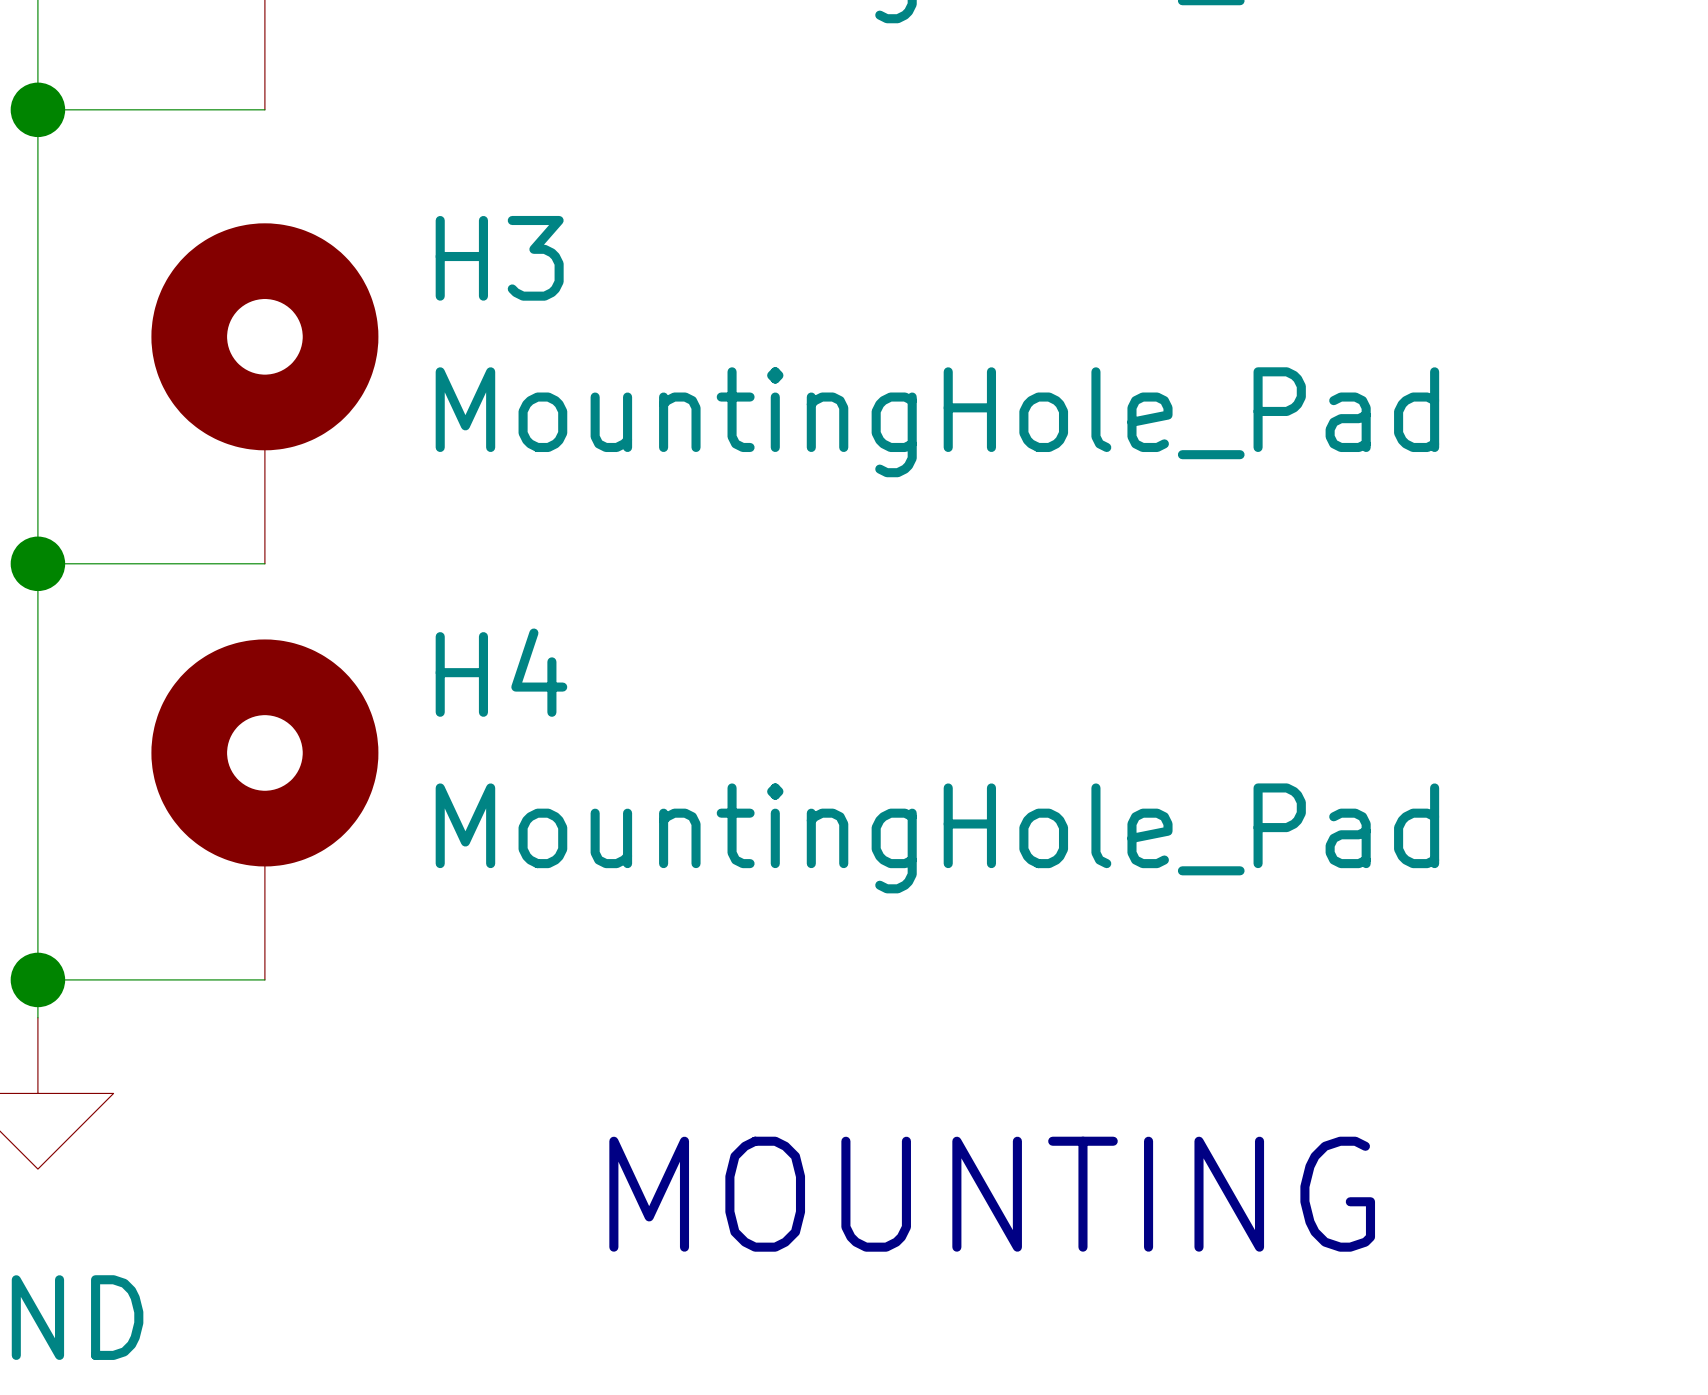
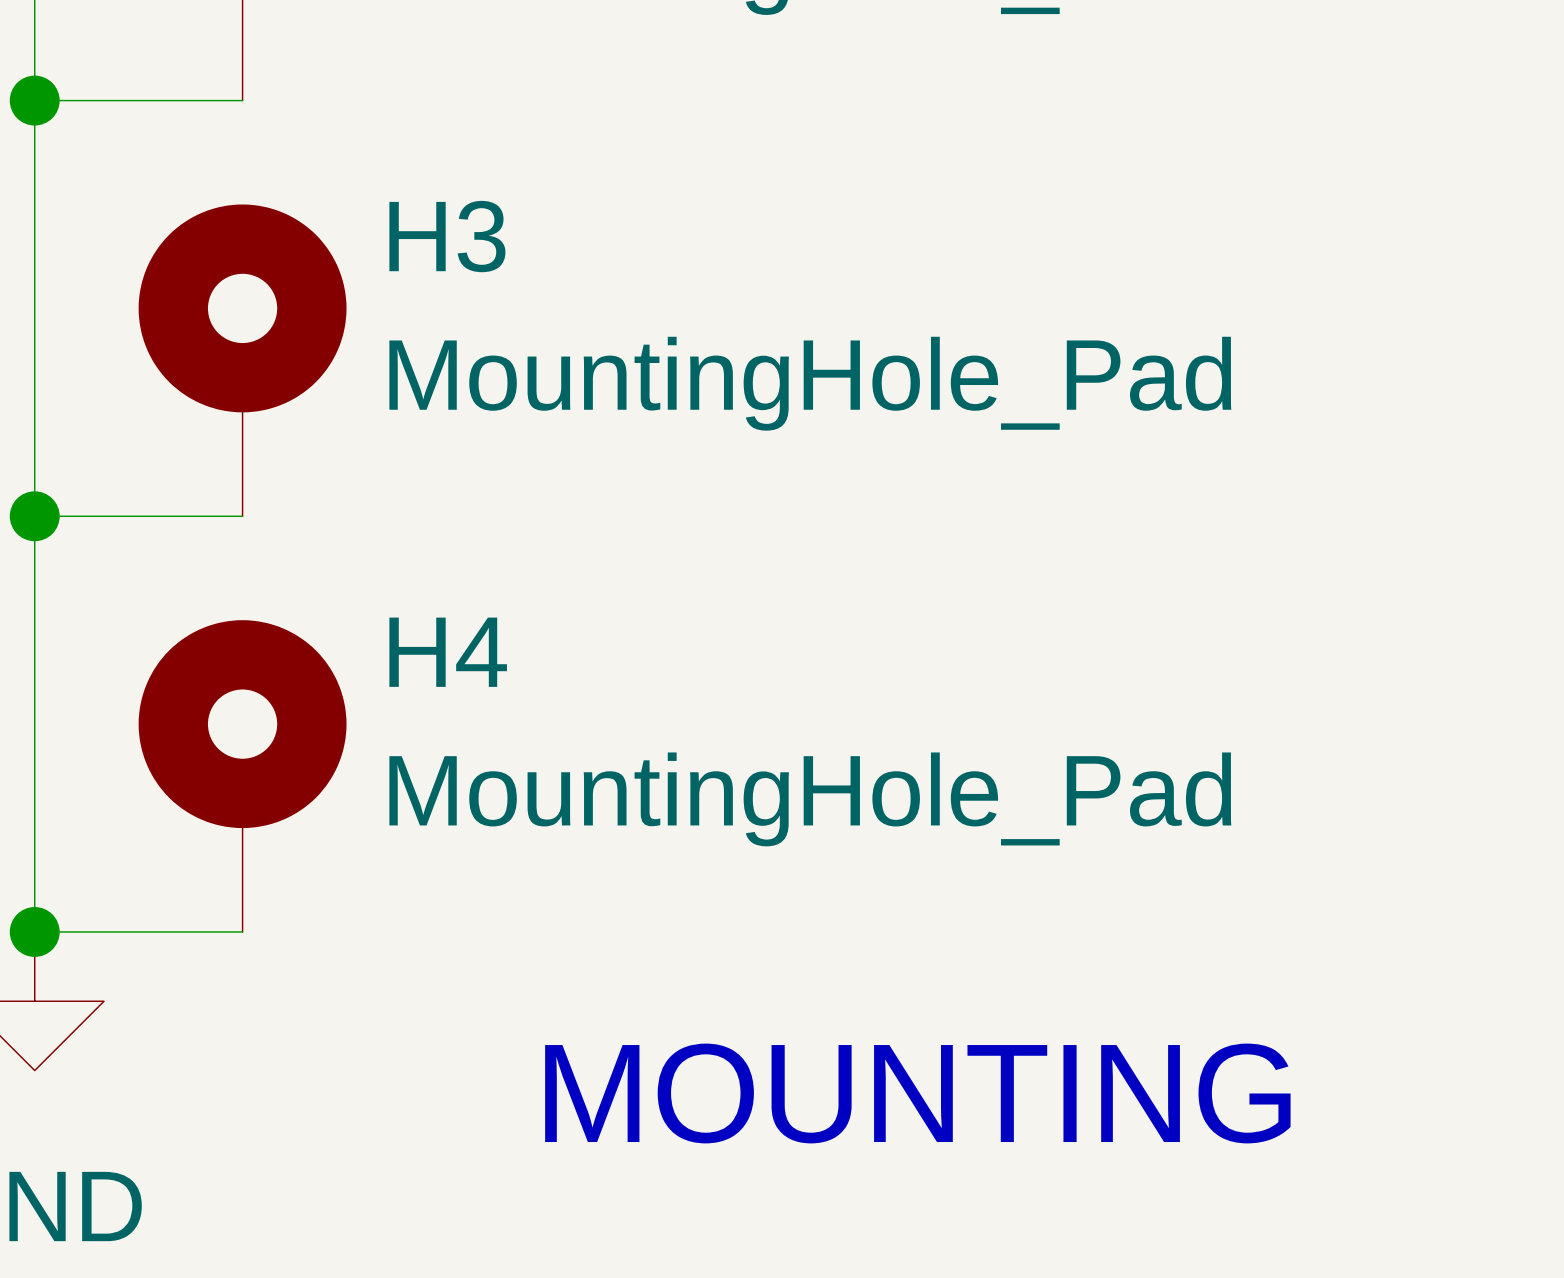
H4 position: (264, 809) -> (242, 776)
wire: (37, 979) (264, 979) -> (34, 931) (242, 931)
junction position: (37, 979) -> (34, 931)

